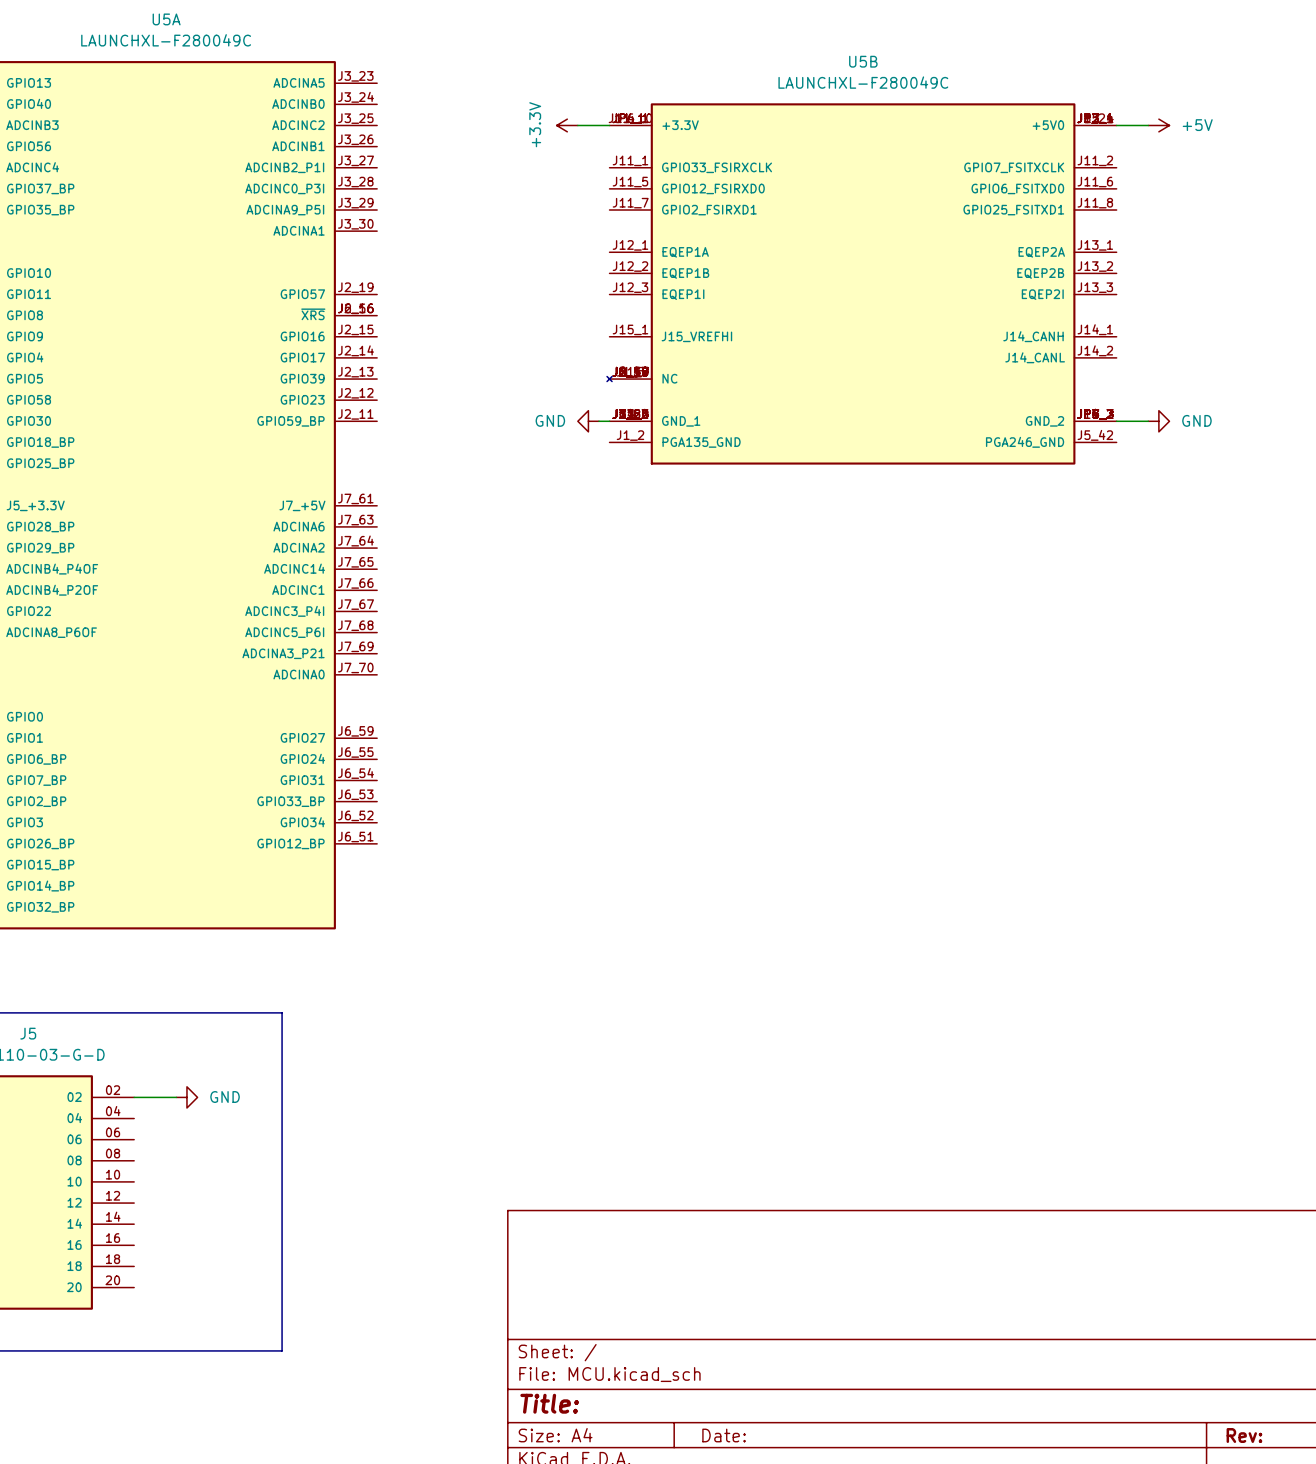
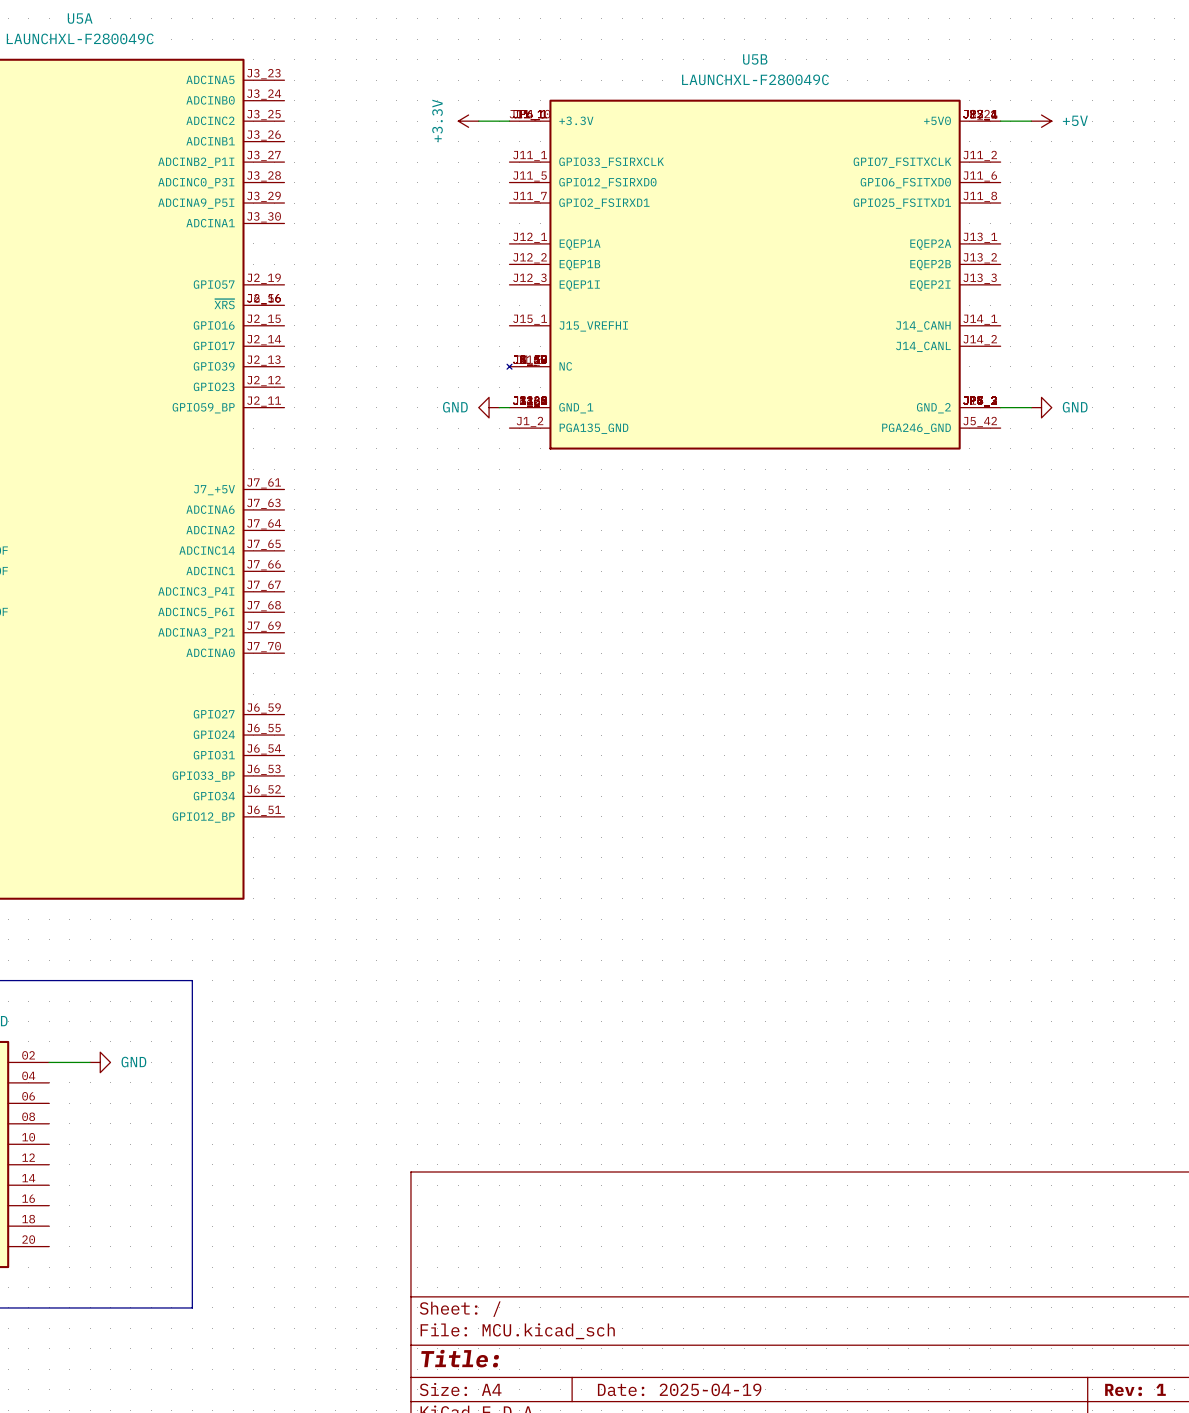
title block: Date: (724, 1435) -> Date: 2025-04-19 (679, 1389)
title block: Rev: (1244, 1435) -> Rev: 1 (1135, 1389)

